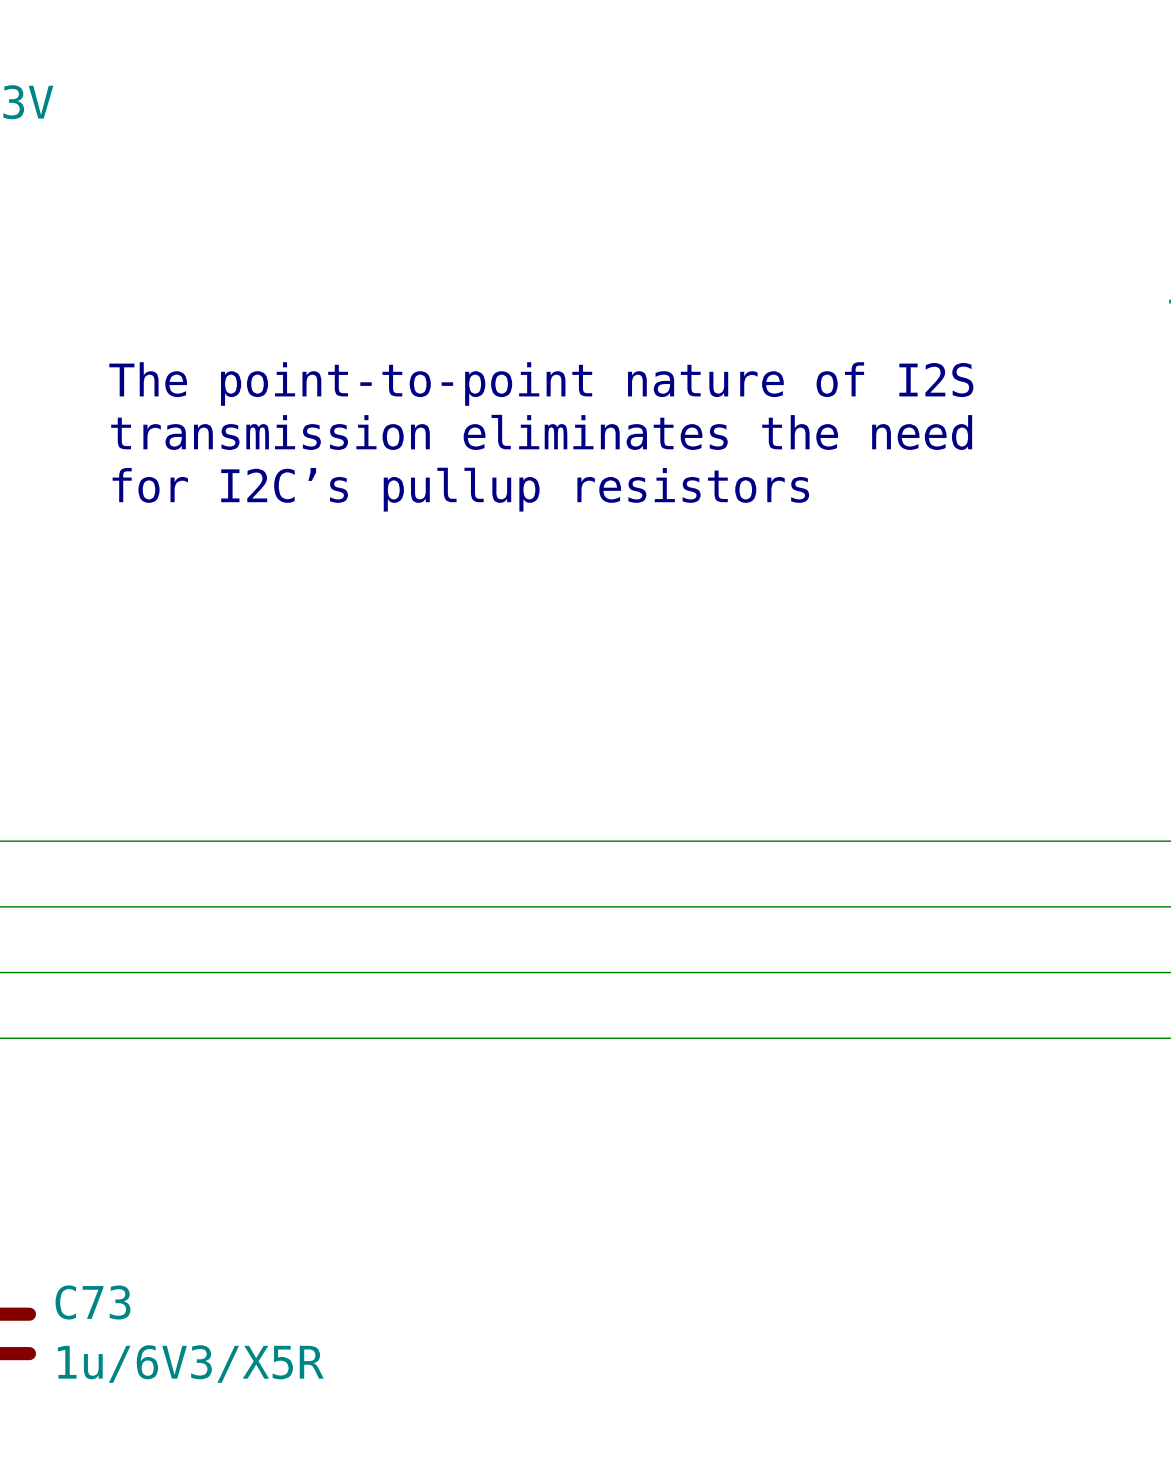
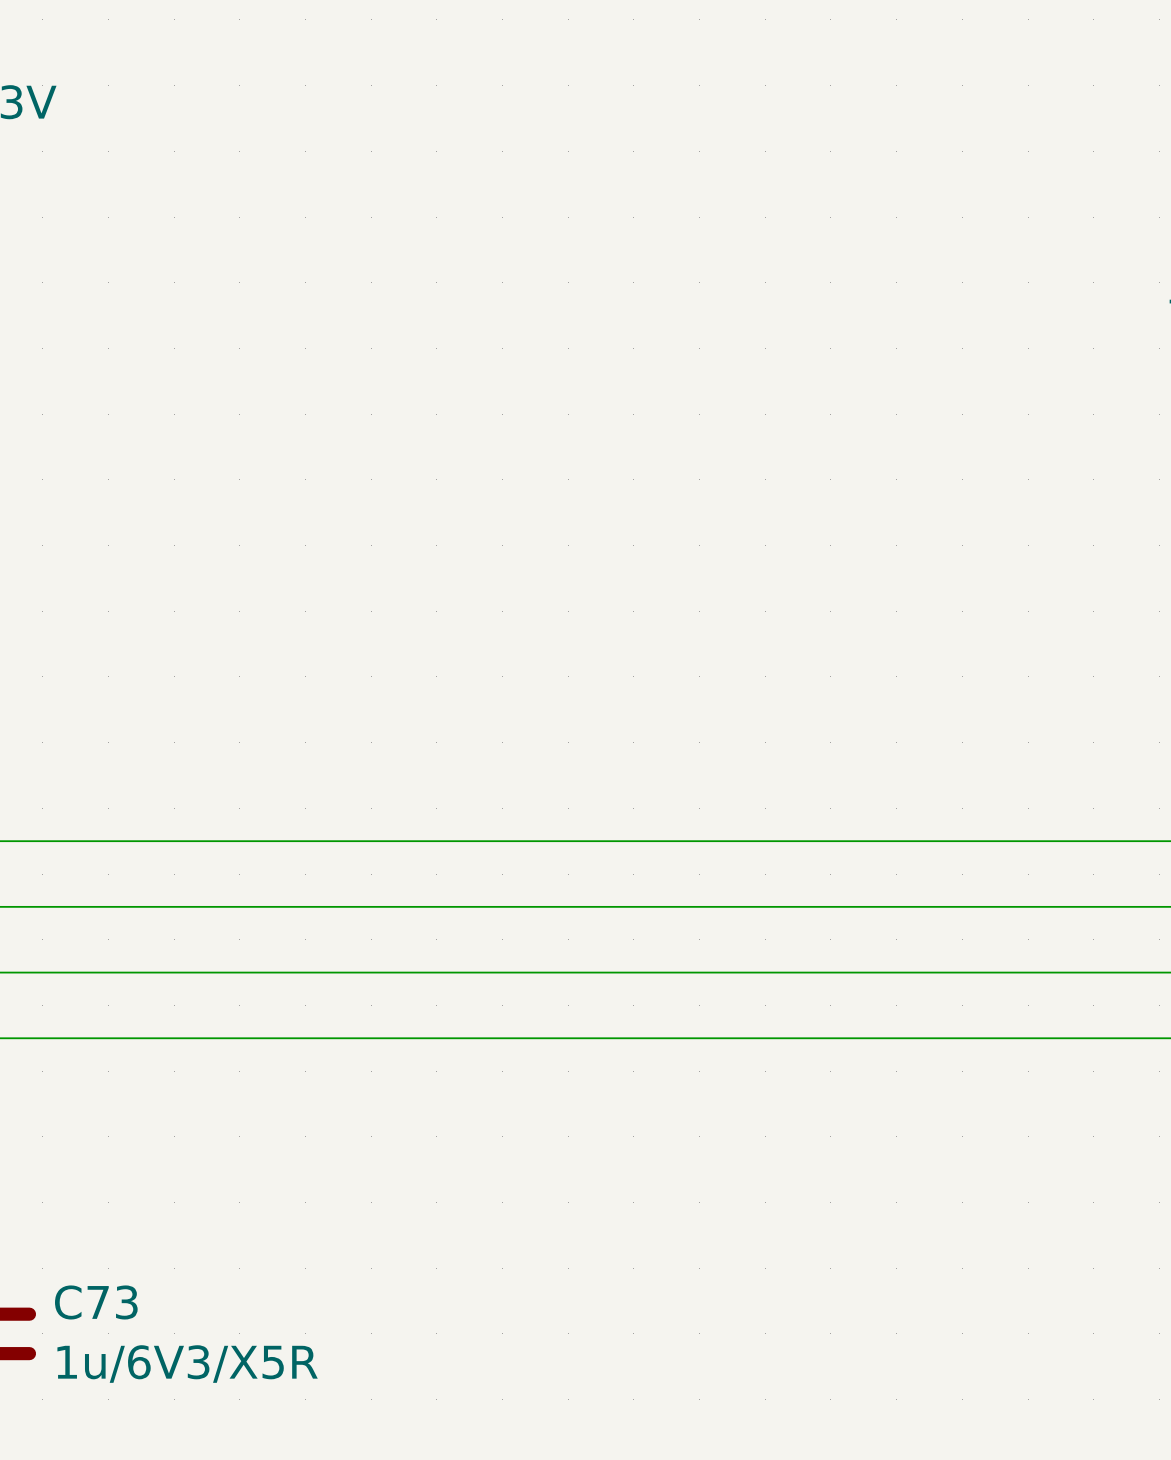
text: The point-to-point nature of I2S (541, 384) -> none
text: transmission eliminates the need (541, 432) -> none
text: for I2C’s pullup resistors (460, 489) -> none

